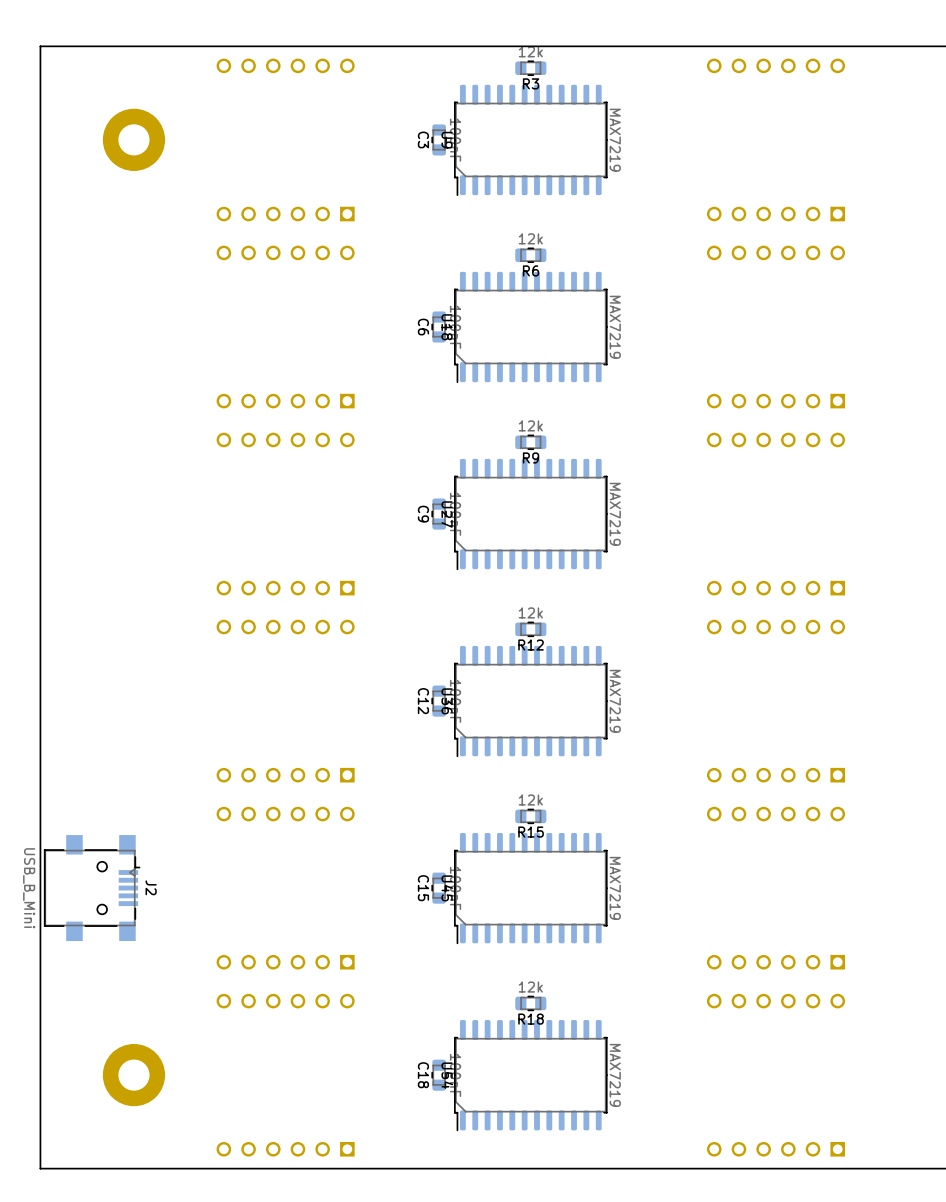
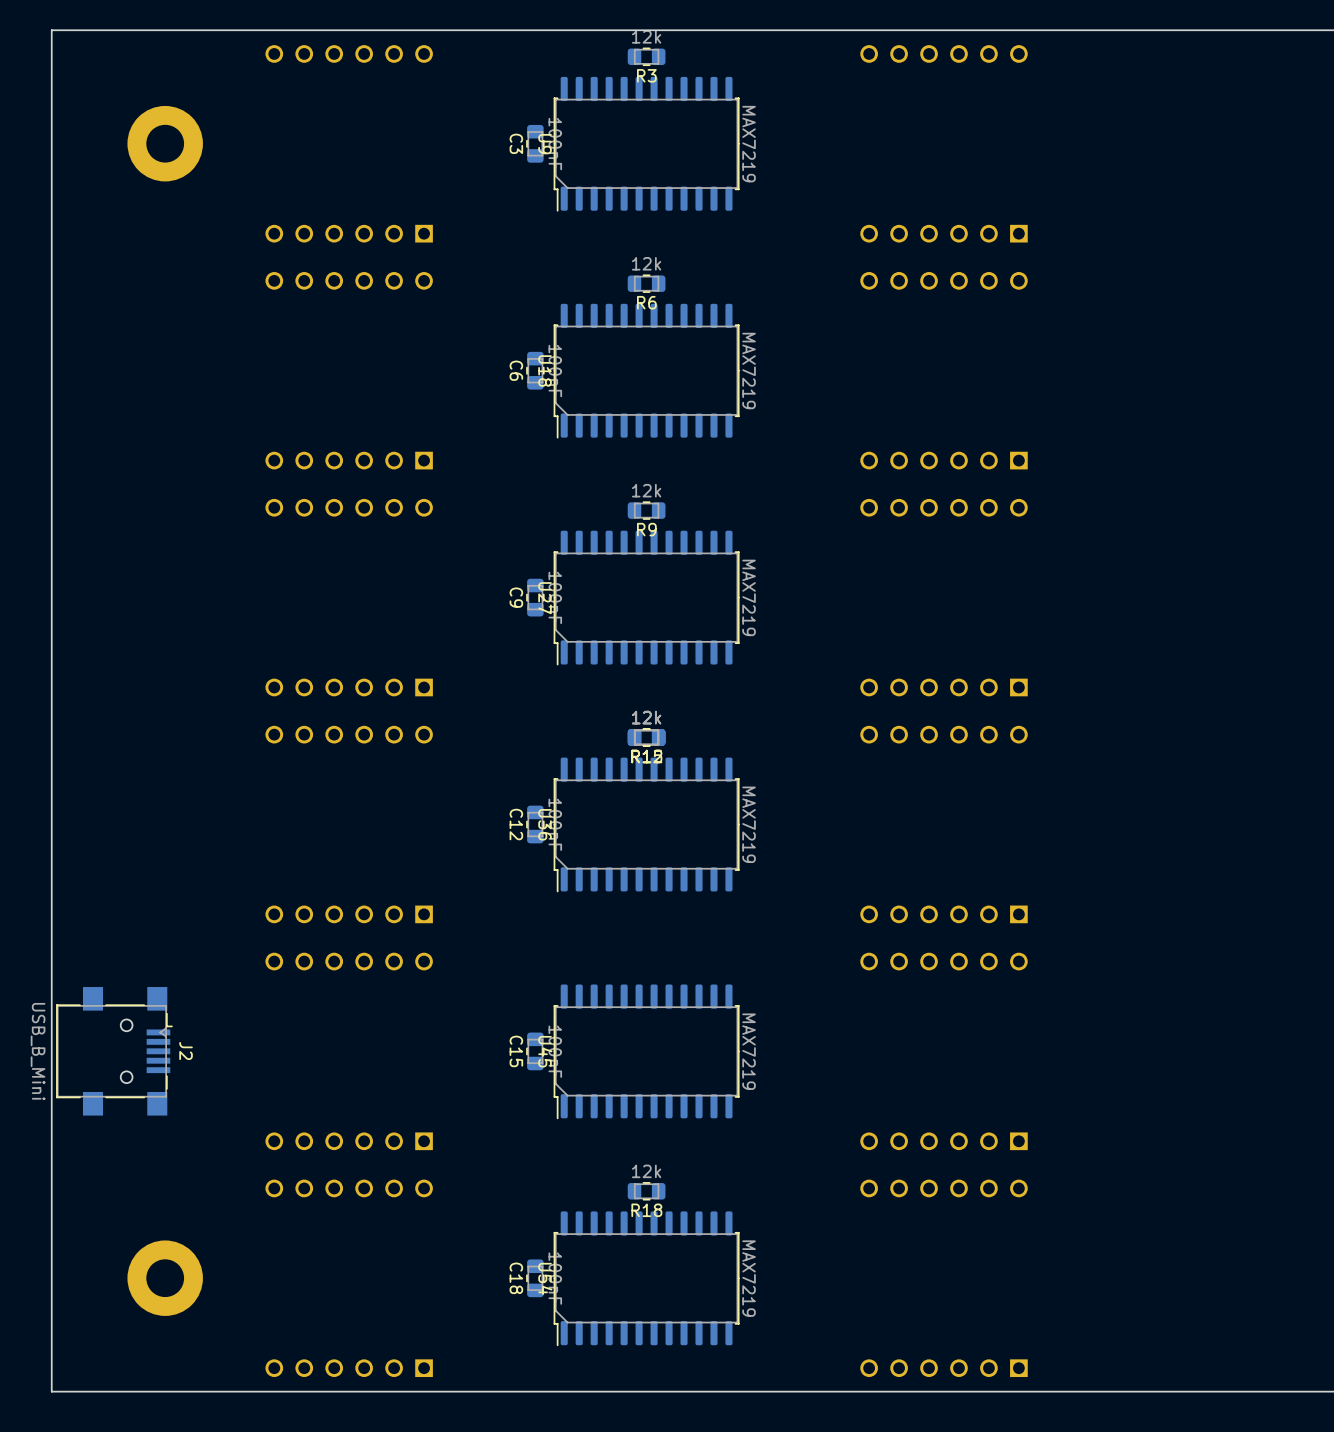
R15 position: (530, 816) -> (646, 737)

